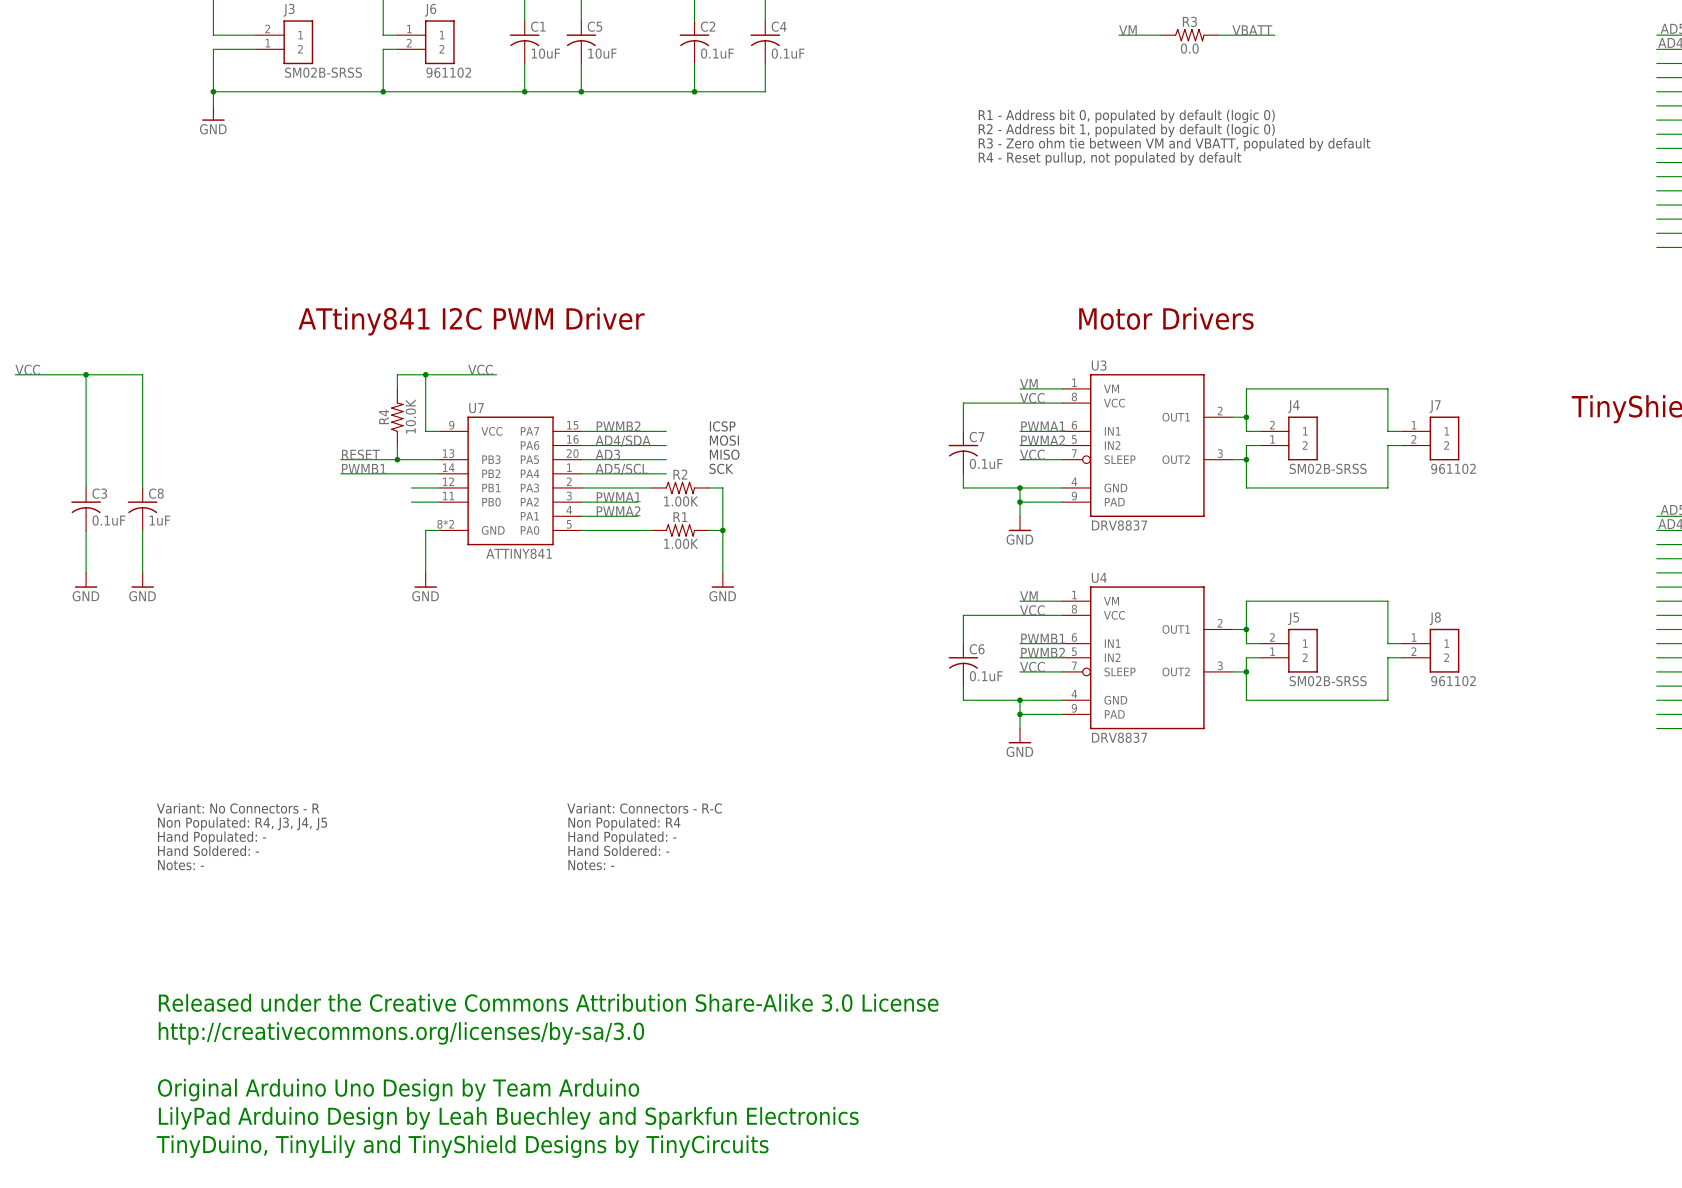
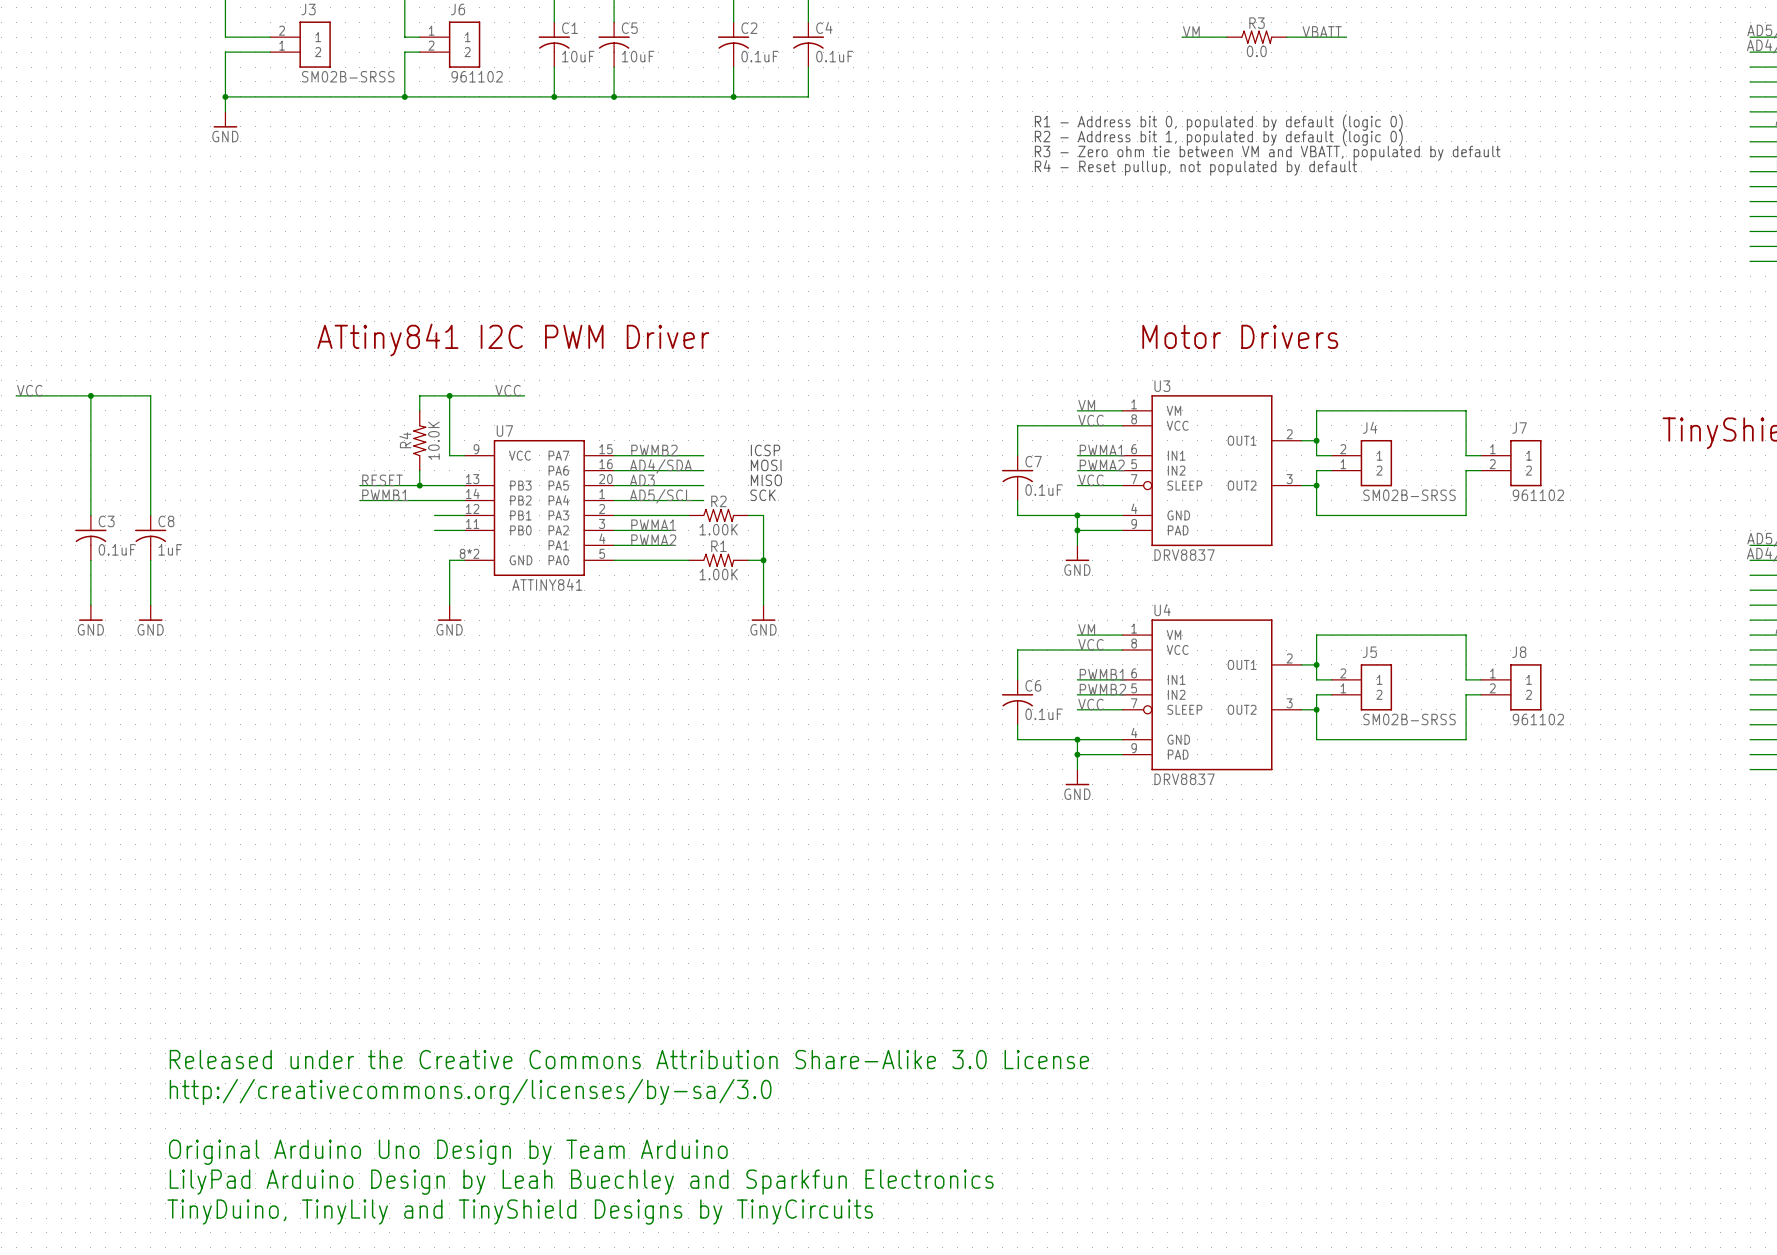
text: Variant: No Connectors - R (238, 808) -> none
text: Variant: Connectors - R-C (644, 808) -> none
text: Non Populated: R4, J3, J4, J5 (242, 823) -> none
text: Non Populated: R4 (624, 823) -> none
text: Hand Populated: - (212, 838) -> none
text: Hand Populated: - (622, 838) -> none
text: Hand Soldered: - (208, 850) -> none
text: Hand Soldered: - (618, 850) -> none
text: Notes: - (180, 865) -> none
text: Notes: - (591, 865) -> none

